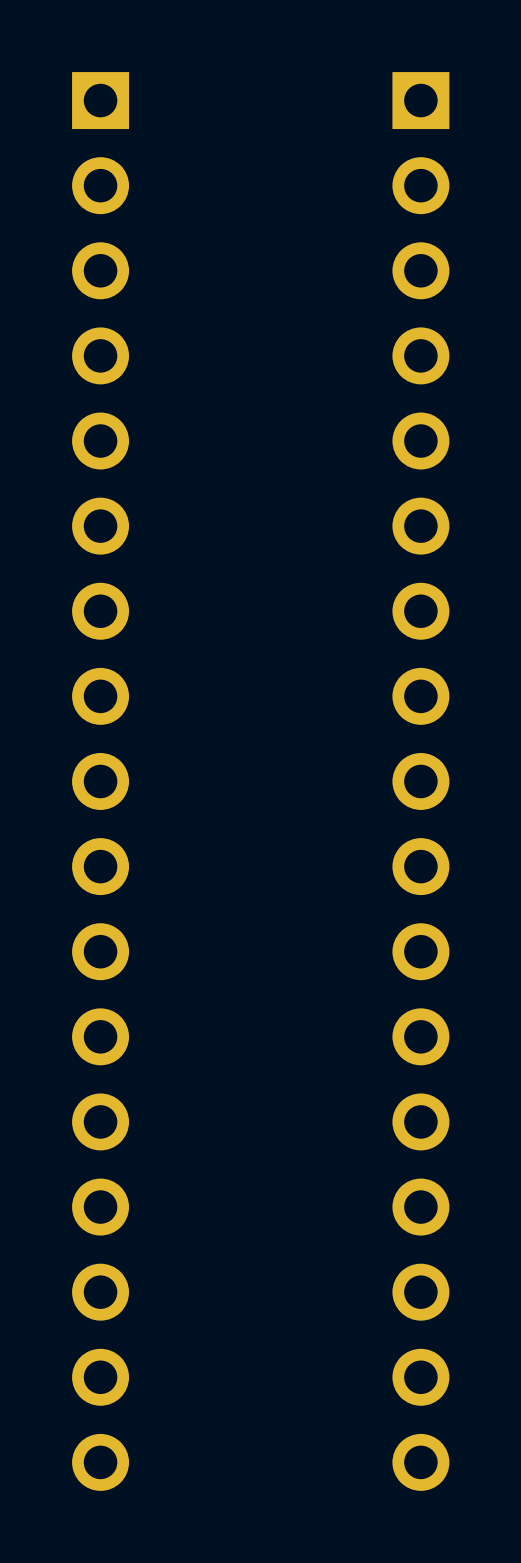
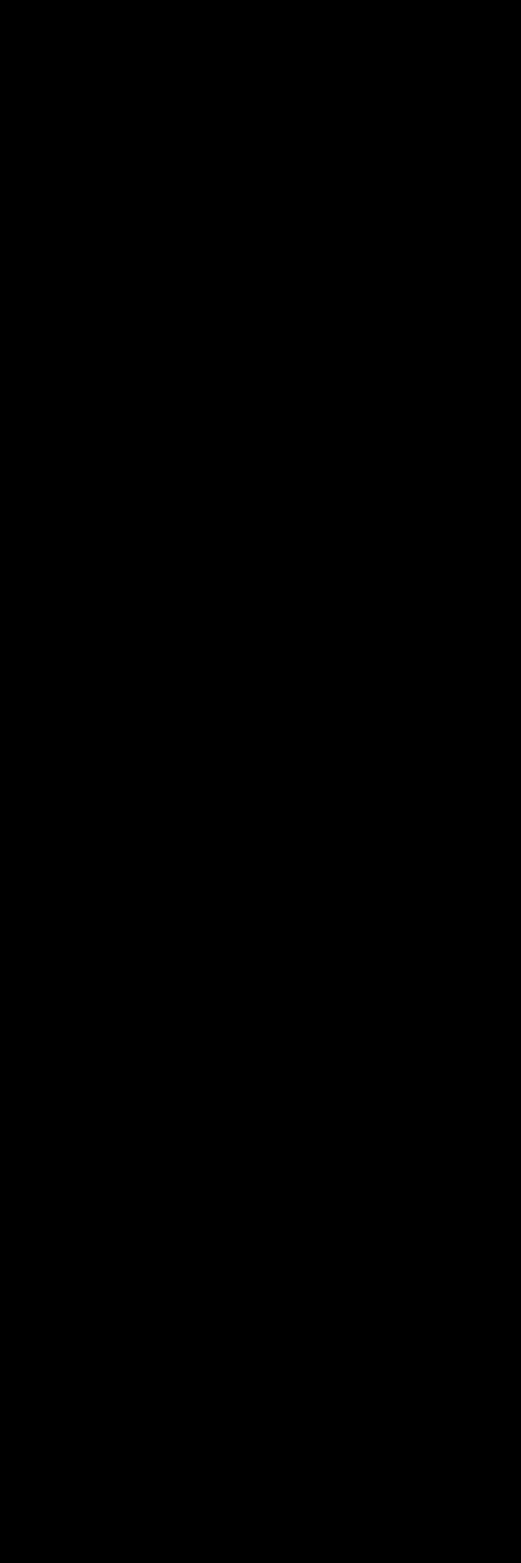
part: (100, 781) -> none
part: (420, 781) -> none

